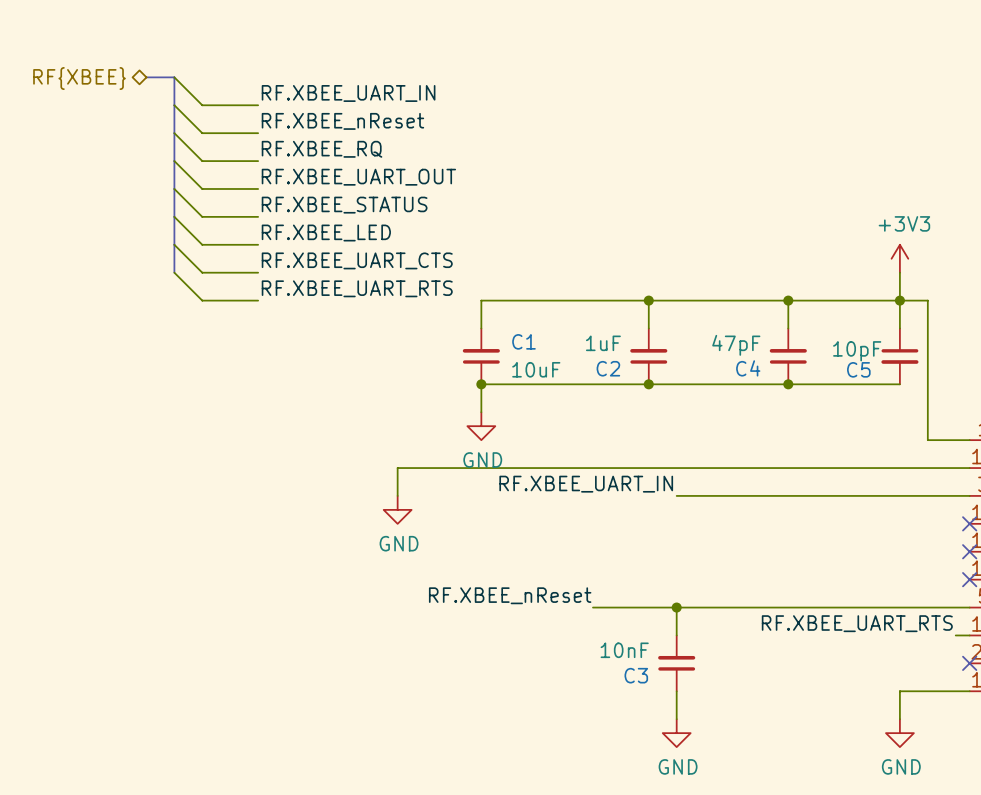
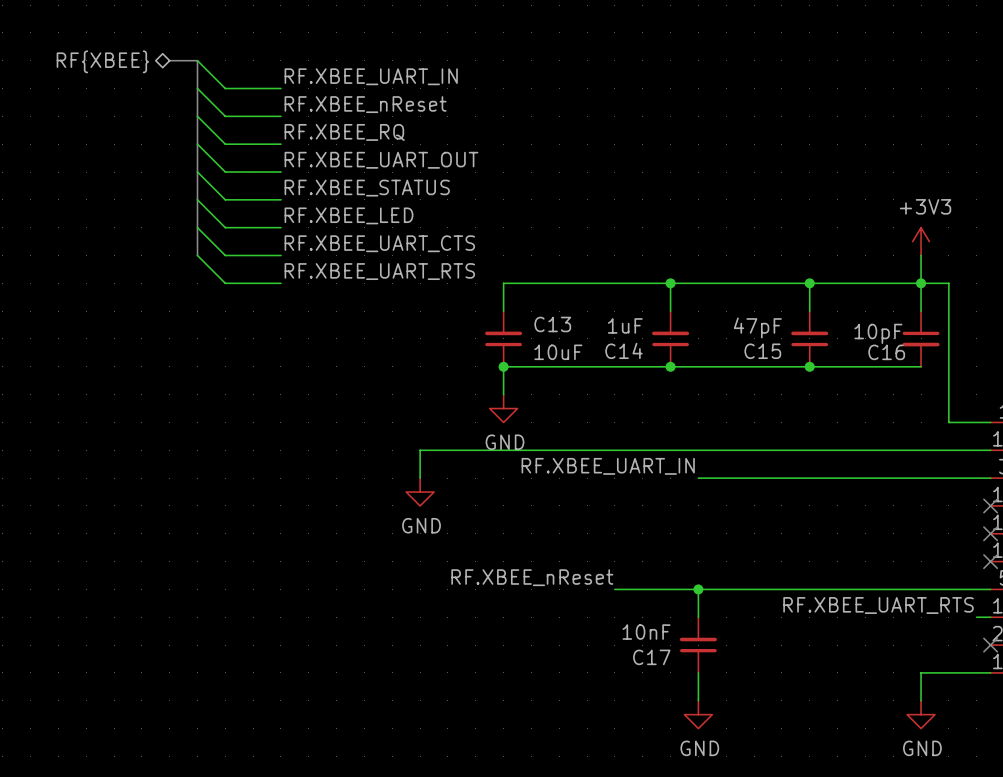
C1 name: C1 (523, 341) -> C13 (552, 324)
C2 name: C2 (608, 368) -> C14 (624, 350)
C4 name: C4 (748, 368) -> C15 (762, 351)
C5 name: C5 (858, 369) -> C16 (886, 352)
C3 name: C3 (636, 675) -> C17 (651, 657)

